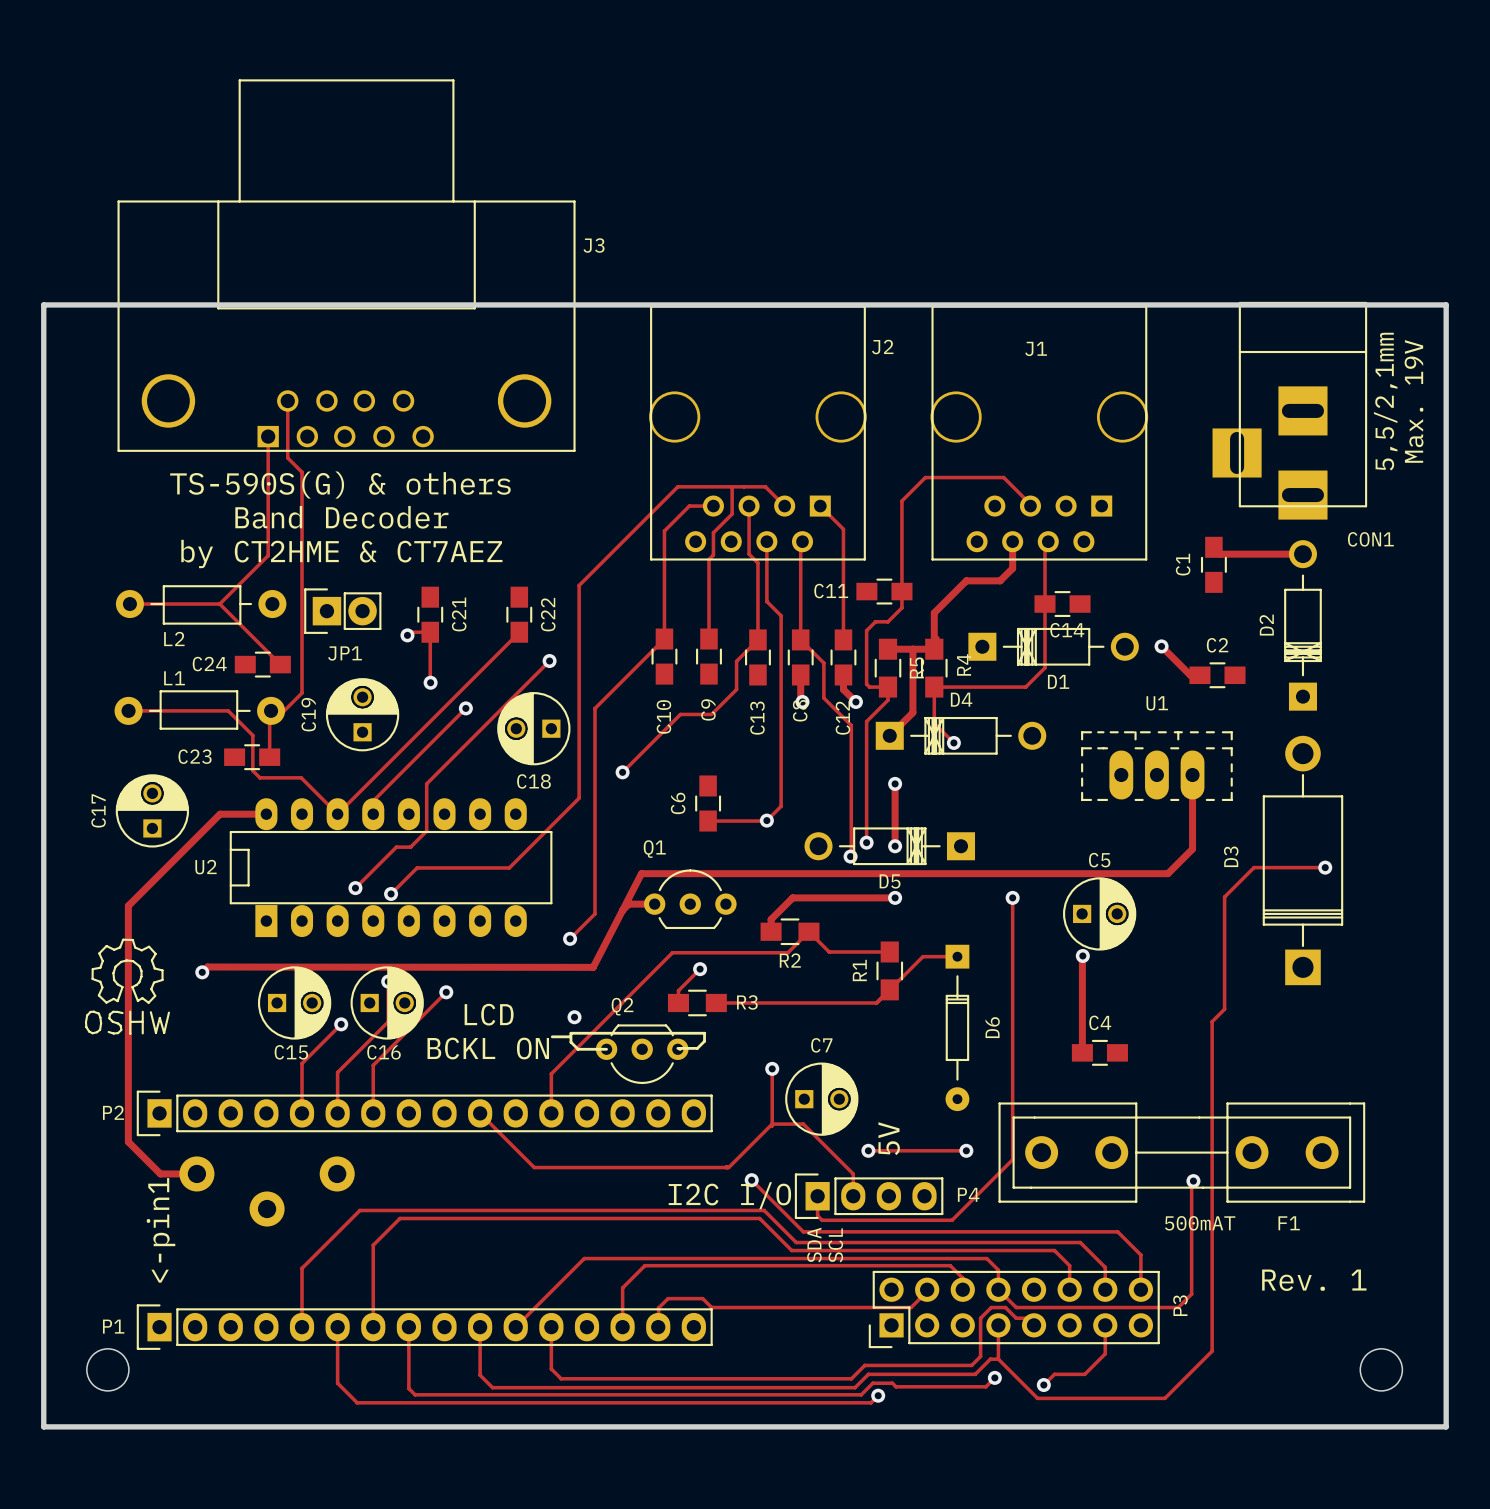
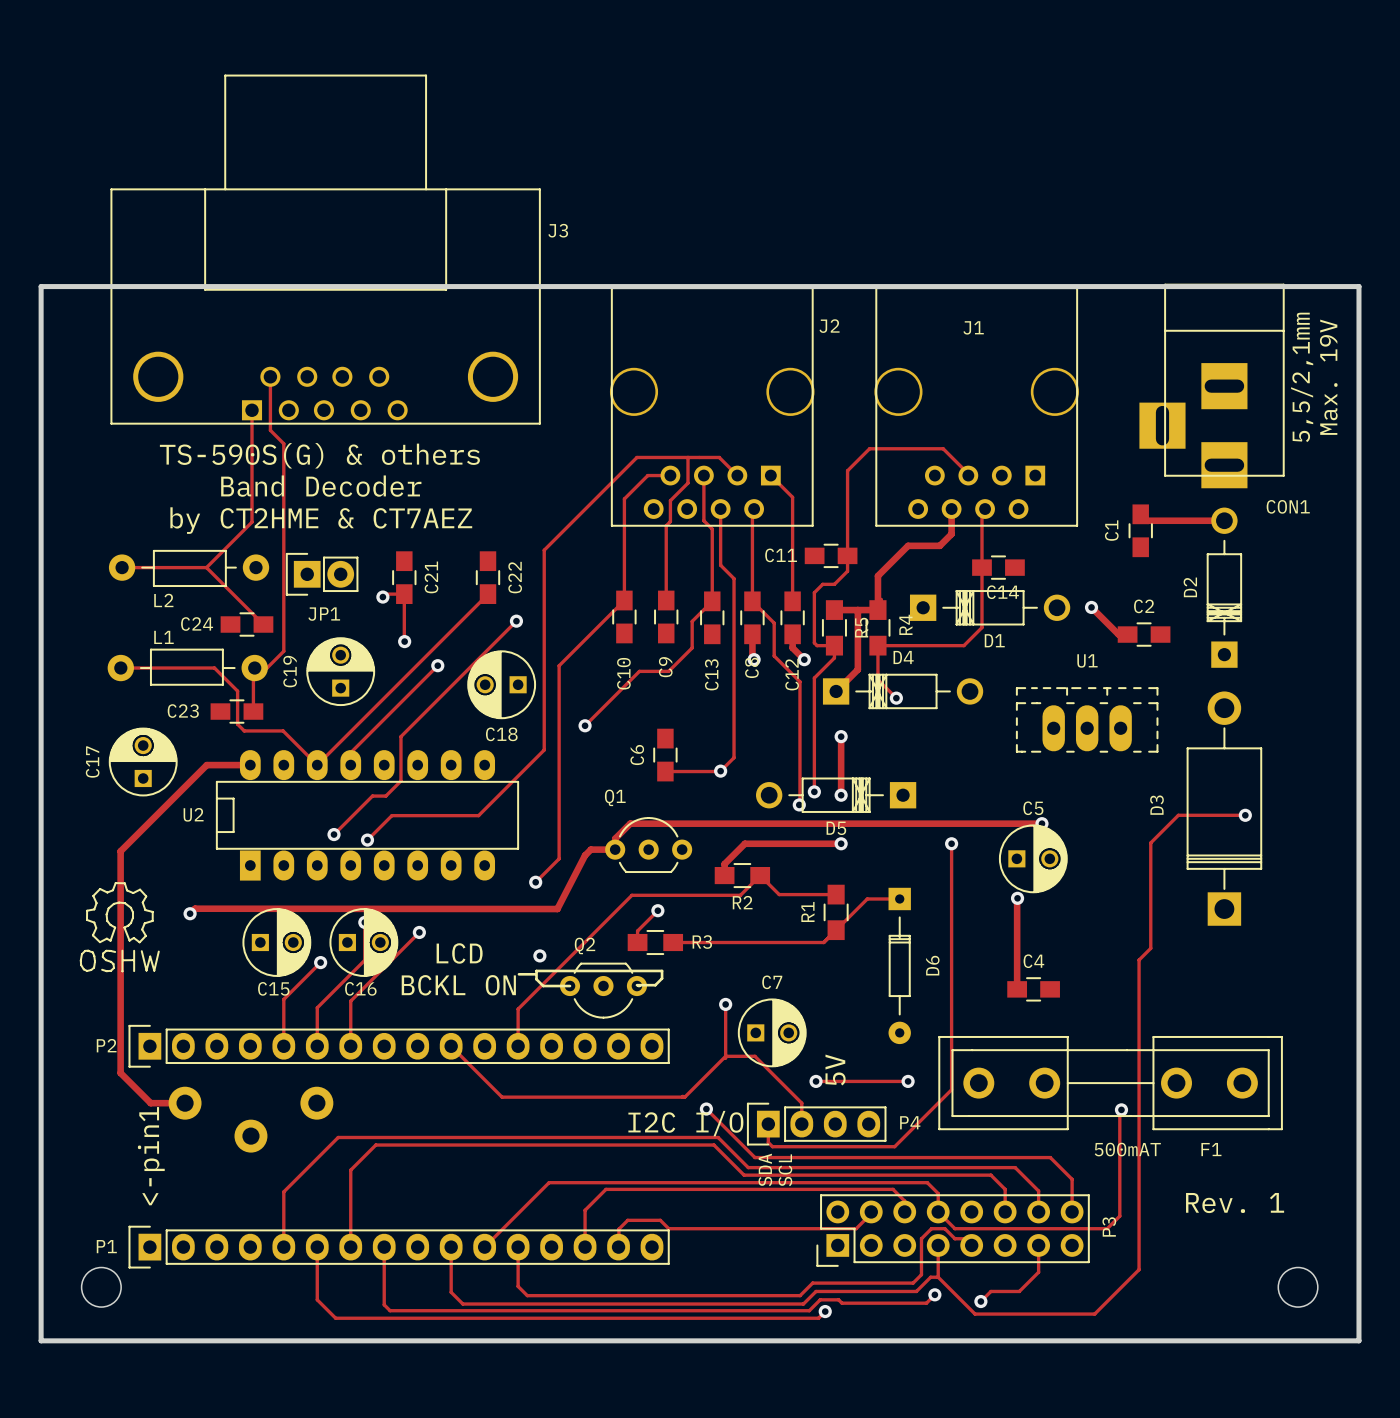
track: (1192, 775) (1192, 849) (1167, 873) (641, 873) (622, 910) -> none
track: none -> (1041, 823) (630, 823) (615, 838) (616, 849)
via: none -> (1041, 823)

